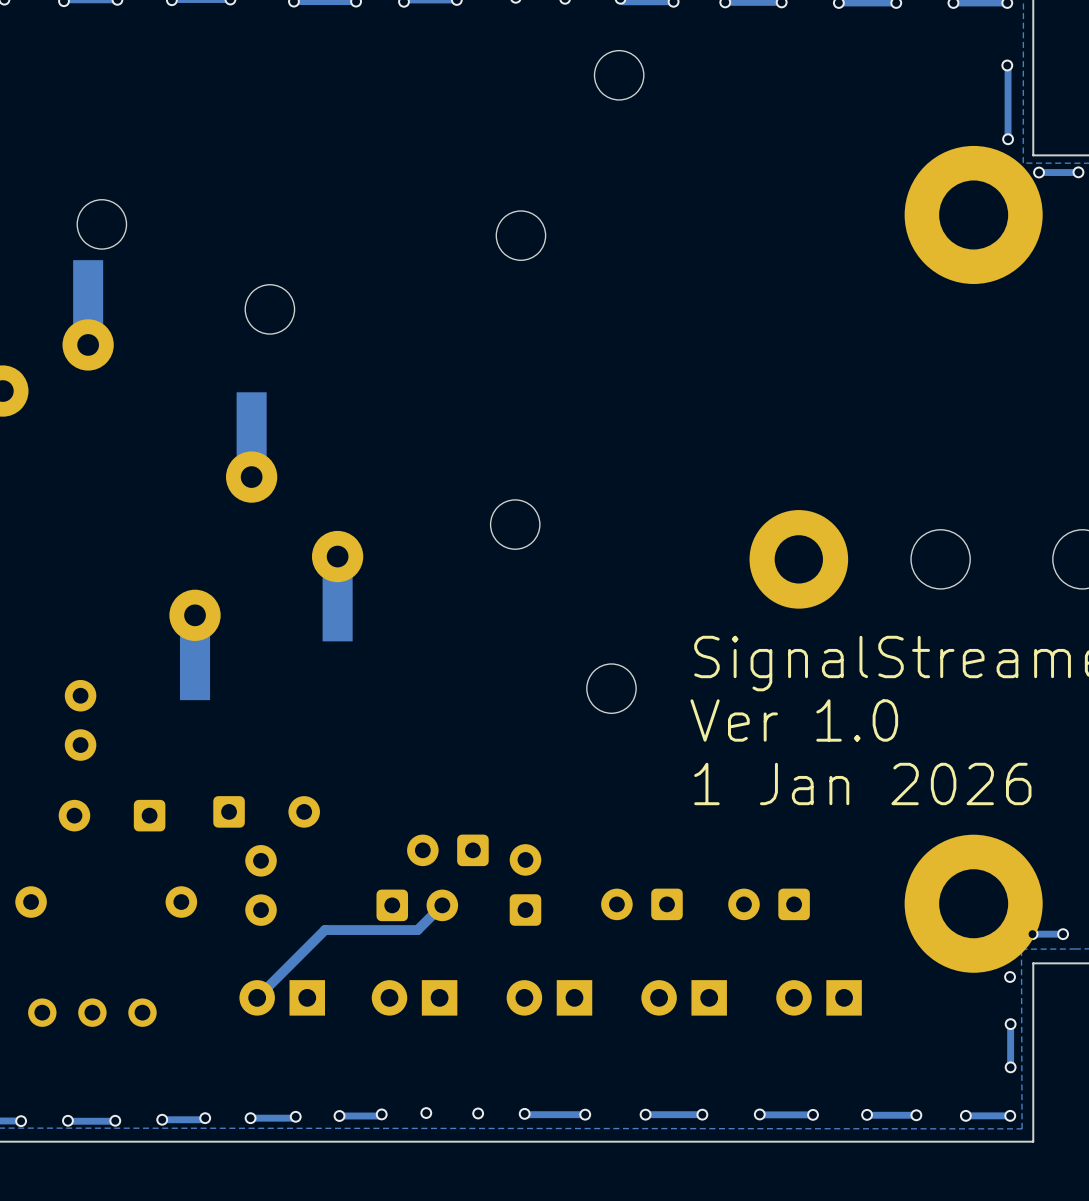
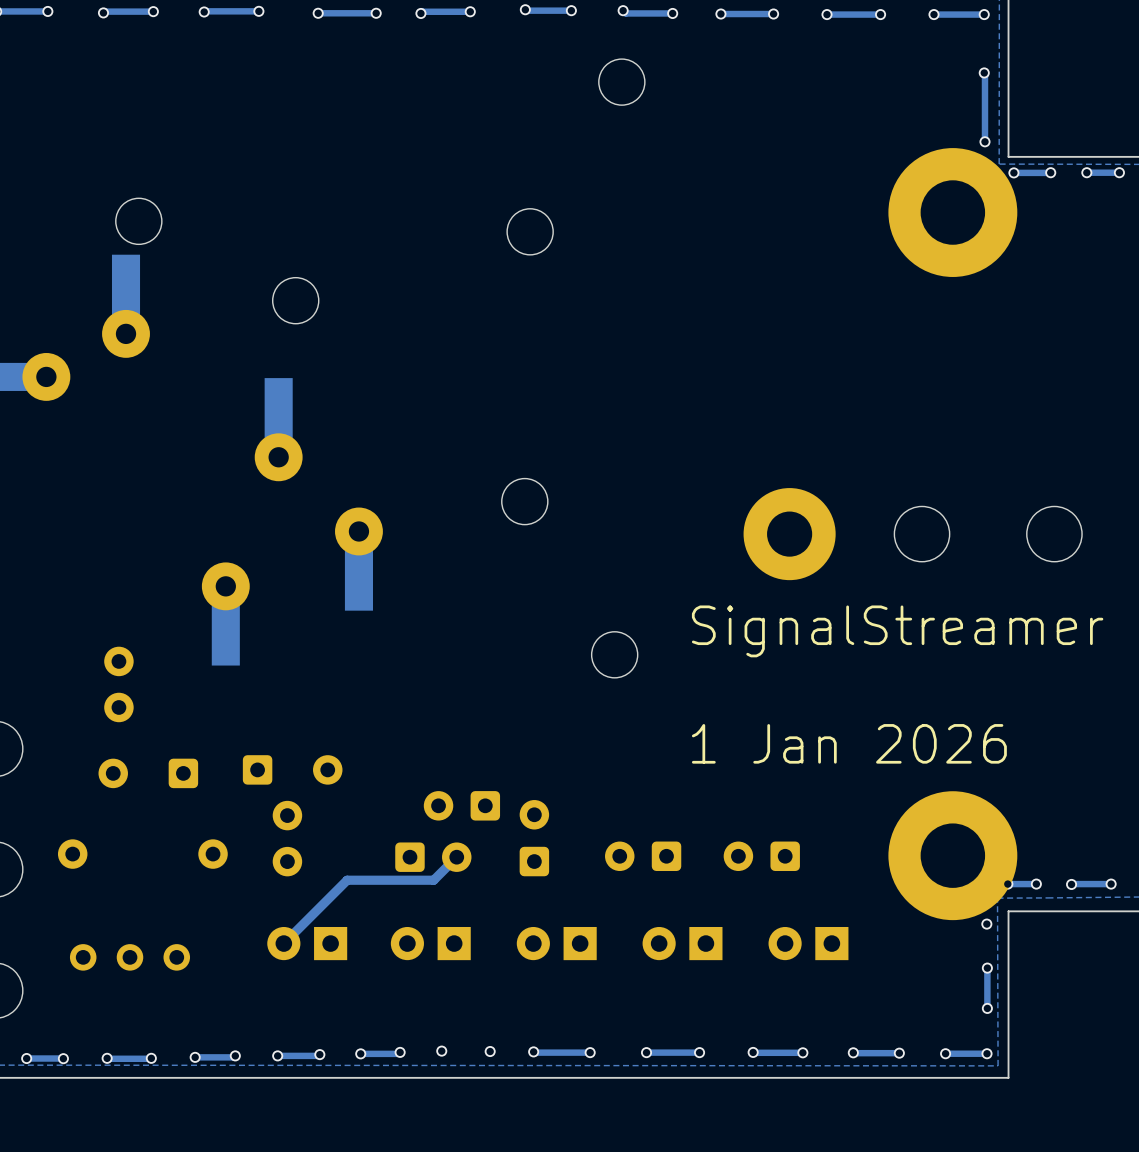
text: Ver 1.0 (794, 720) -> none

